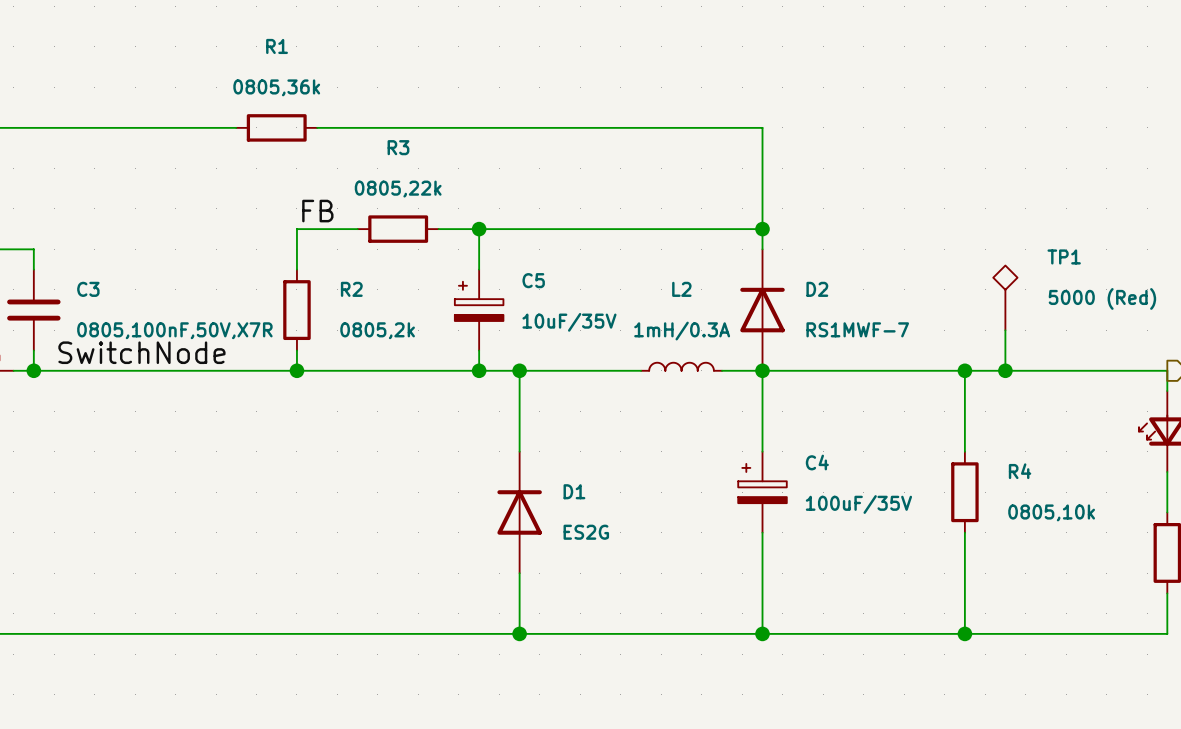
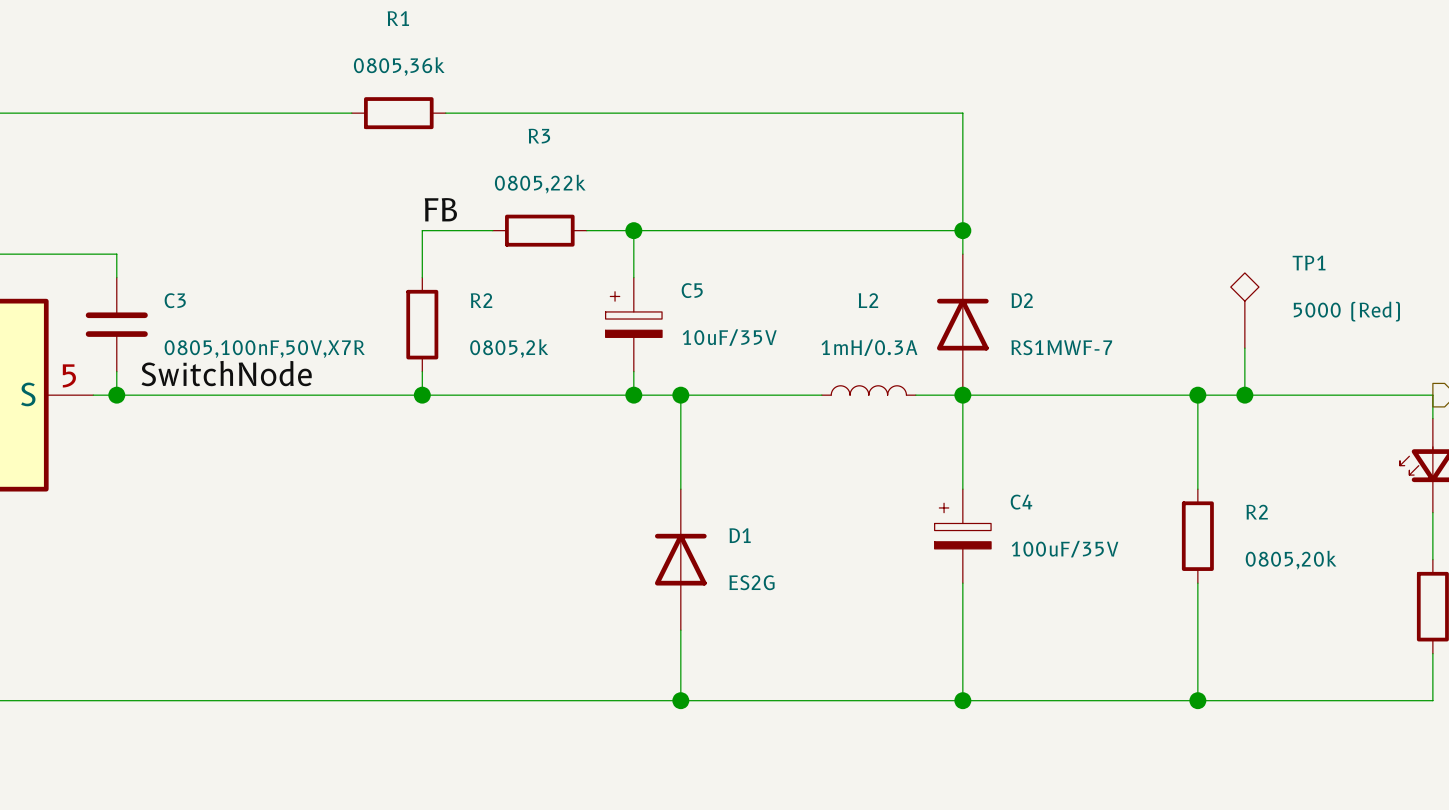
R4 name: R4 (1020, 471) -> R2 (1257, 512)
R4 value: 0805,10k (1051, 512) -> 0805,20k (1291, 560)

